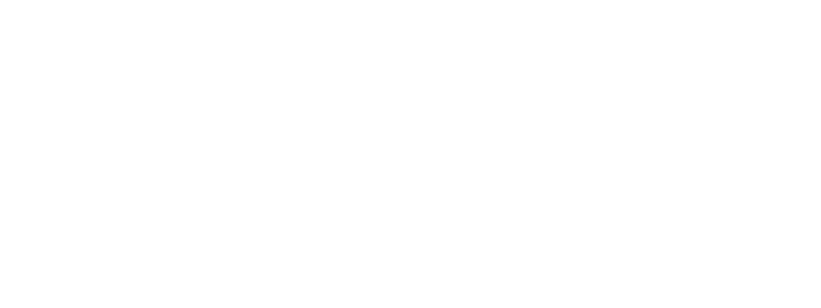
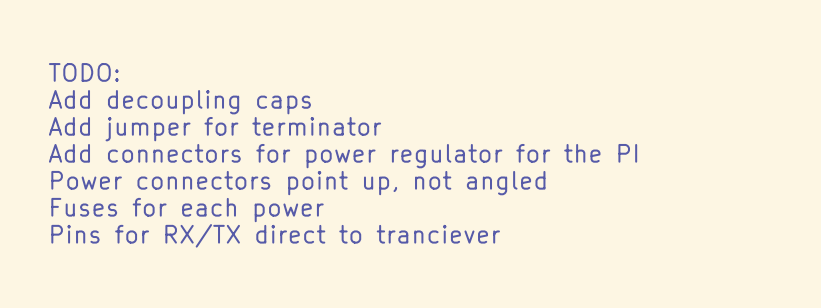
text: none -> TODO: (83, 72)
text: none -> Add decoupling caps (179, 102)
text: none -> Add jumper for terminator (215, 129)
text: none -> Add connectors for power regulator for the PI (343, 156)
text: none -> Power connectors point up, not angled (298, 183)
text: none -> Fuses for each power (187, 210)
text: none -> Pins for RX/TX direct to tranciever (275, 235)

